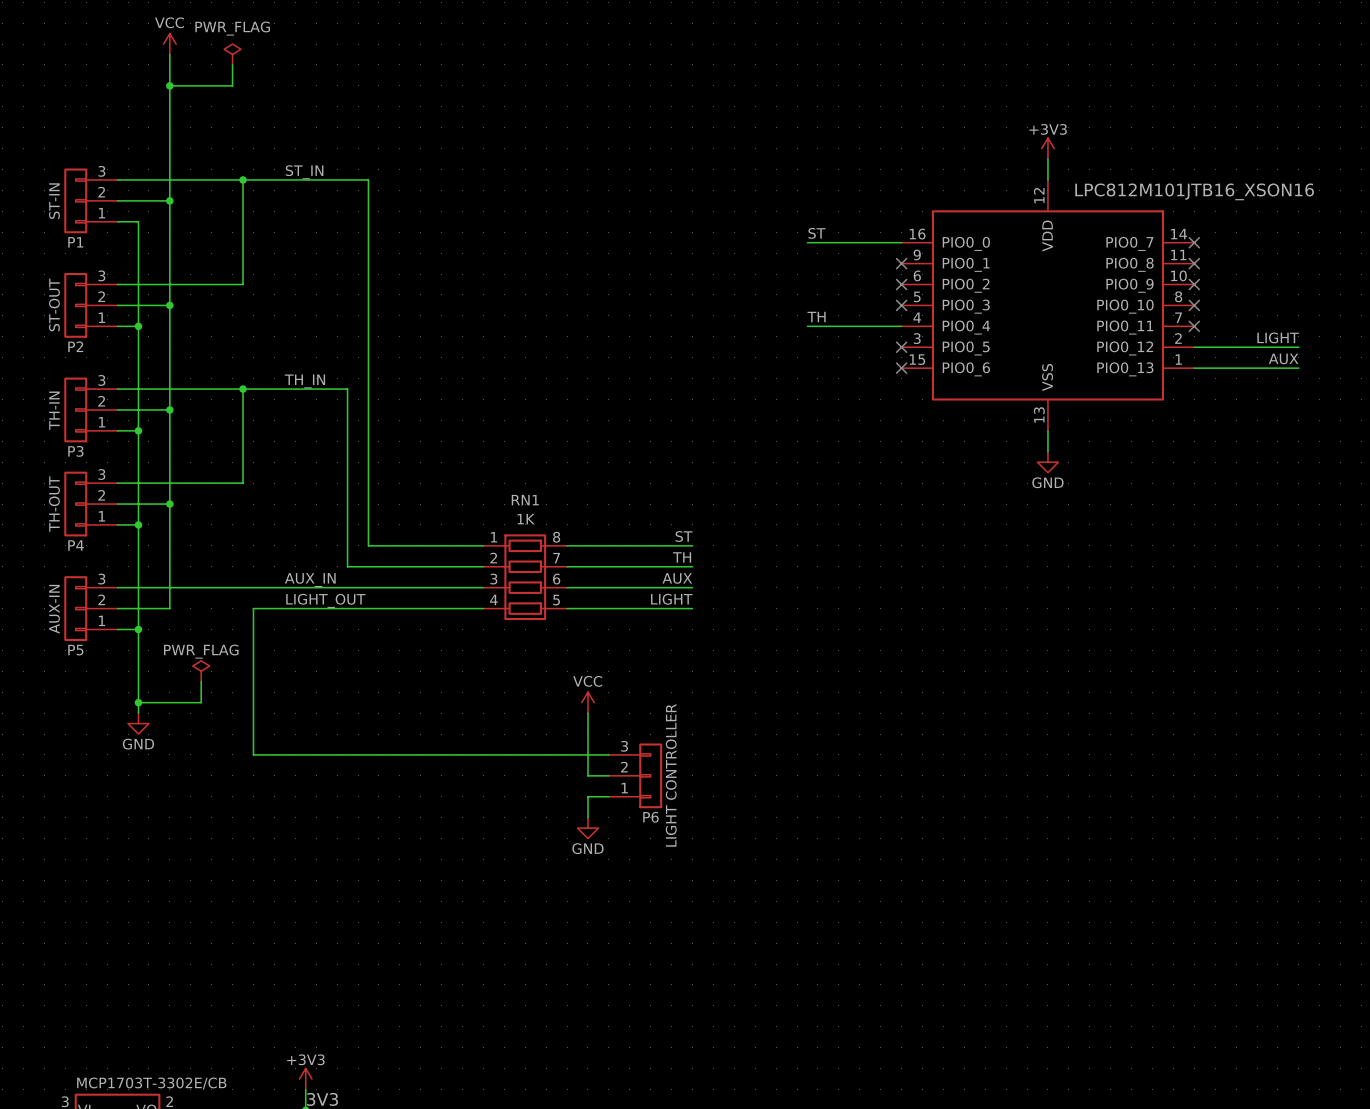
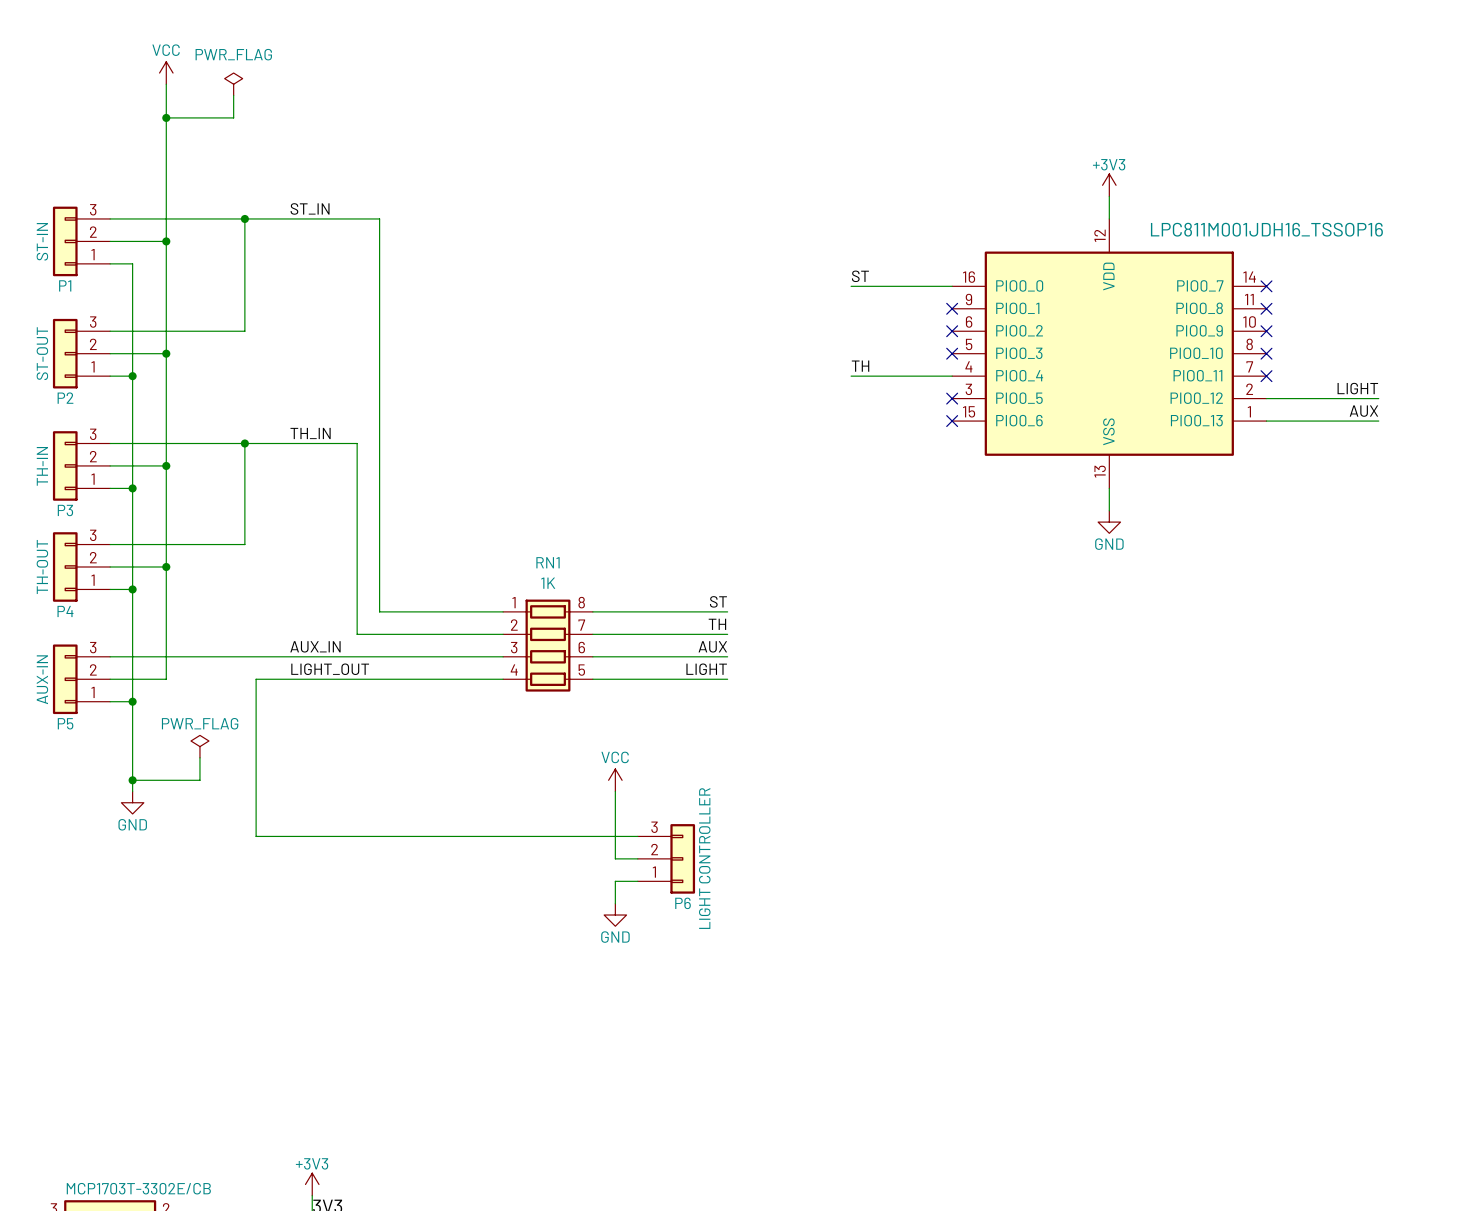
part value: LPC812M101JTB16_XSON16 (1194, 191) -> LPC811M001JDH16_TSSOP16 (1266, 229)

